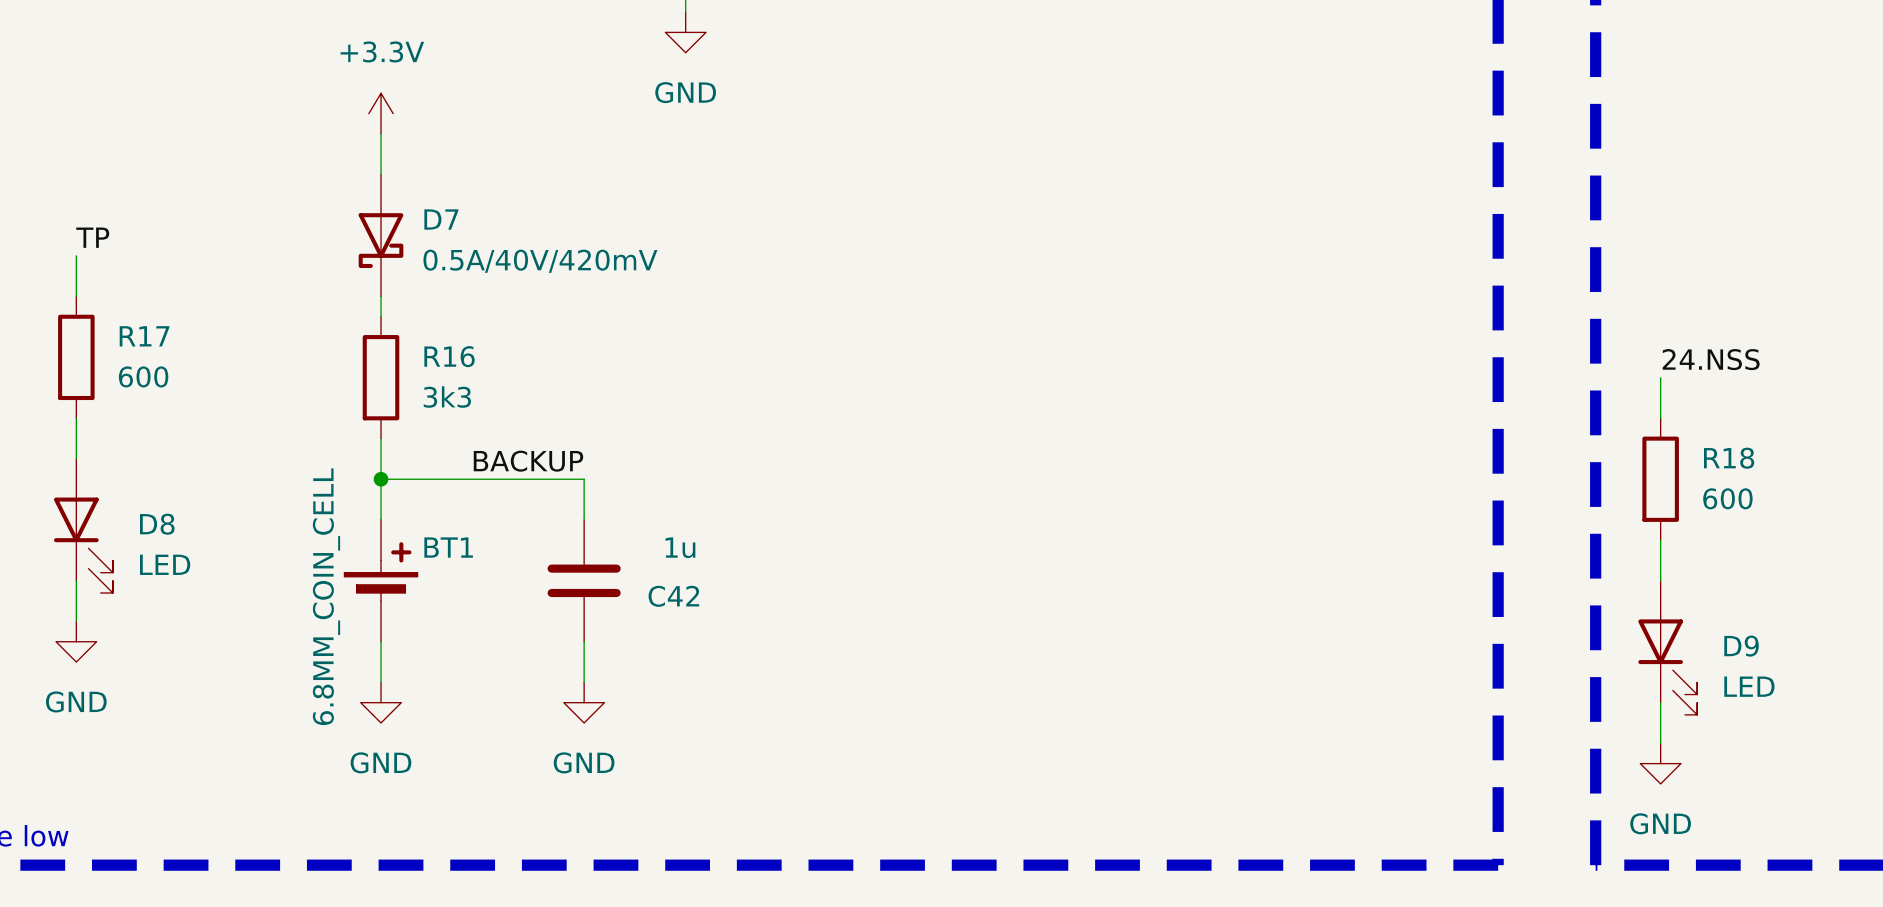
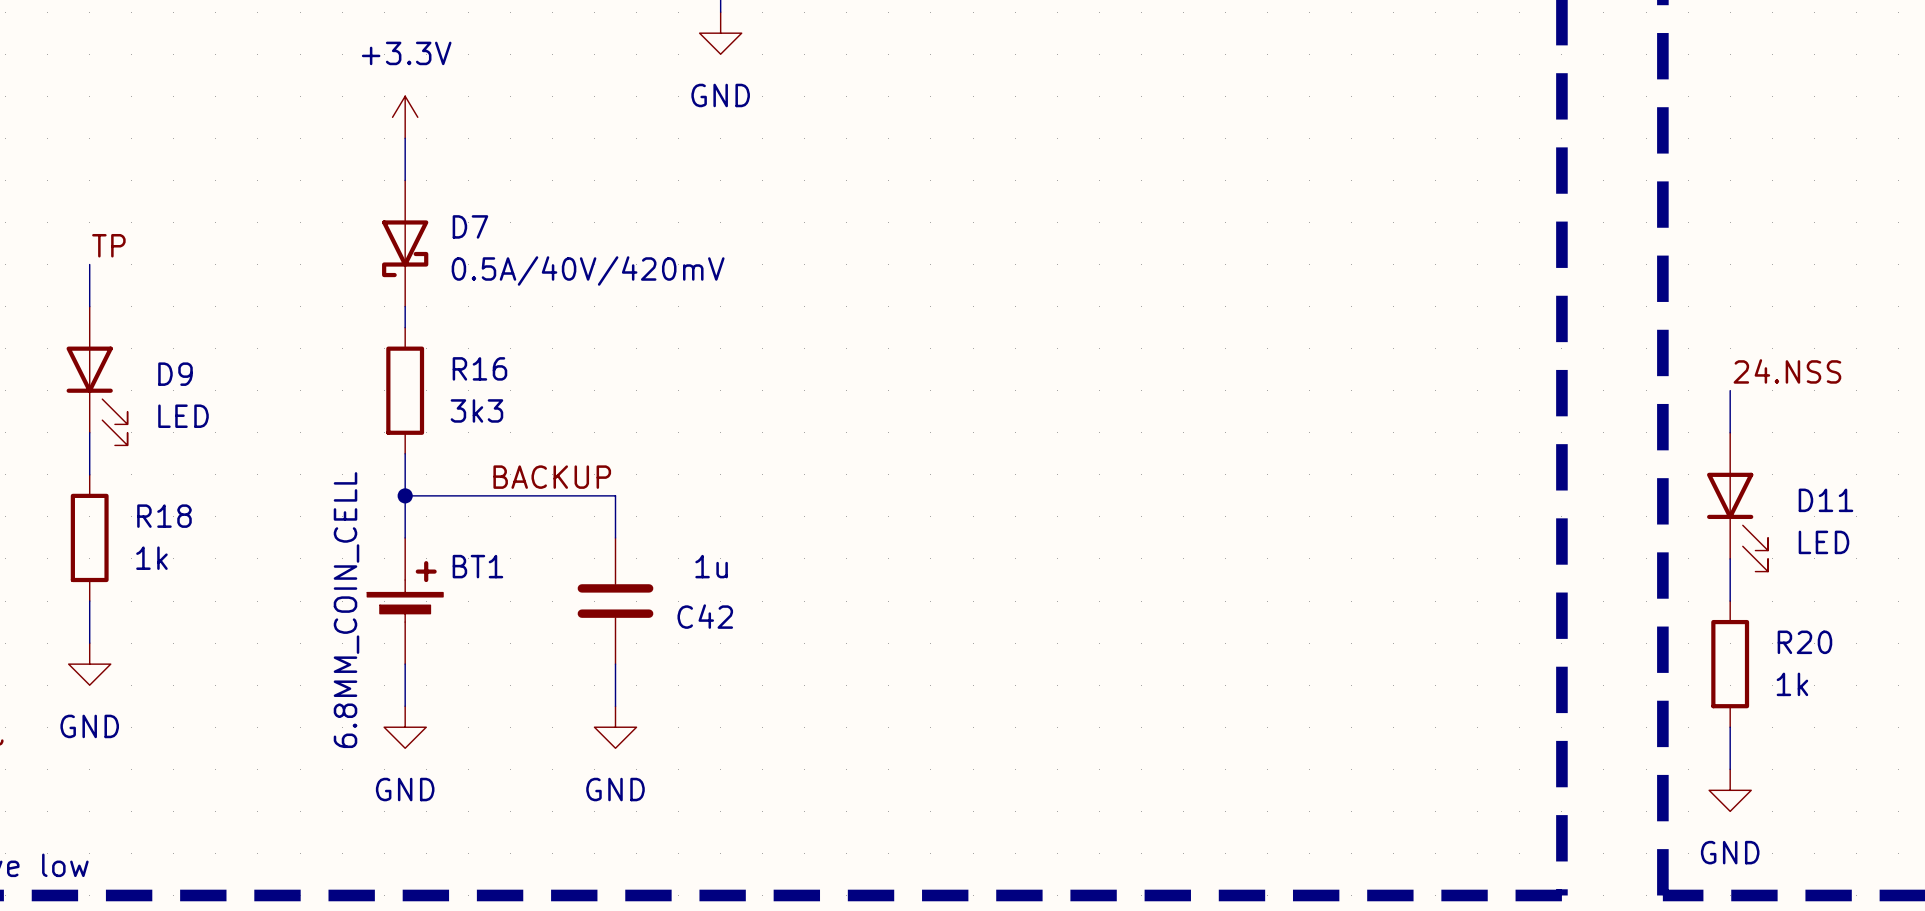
R17: 600 (76, 357) -> none
R18 position: (1660, 479) -> (89, 537)
D11: none -> LED (1737, 502)
R18 value: 600 (1727, 498) -> 1k (151, 558)
D8: LED (83, 525) -> none
R20: none -> 1k (1730, 664)
D9 position: (1667, 647) -> (97, 375)

